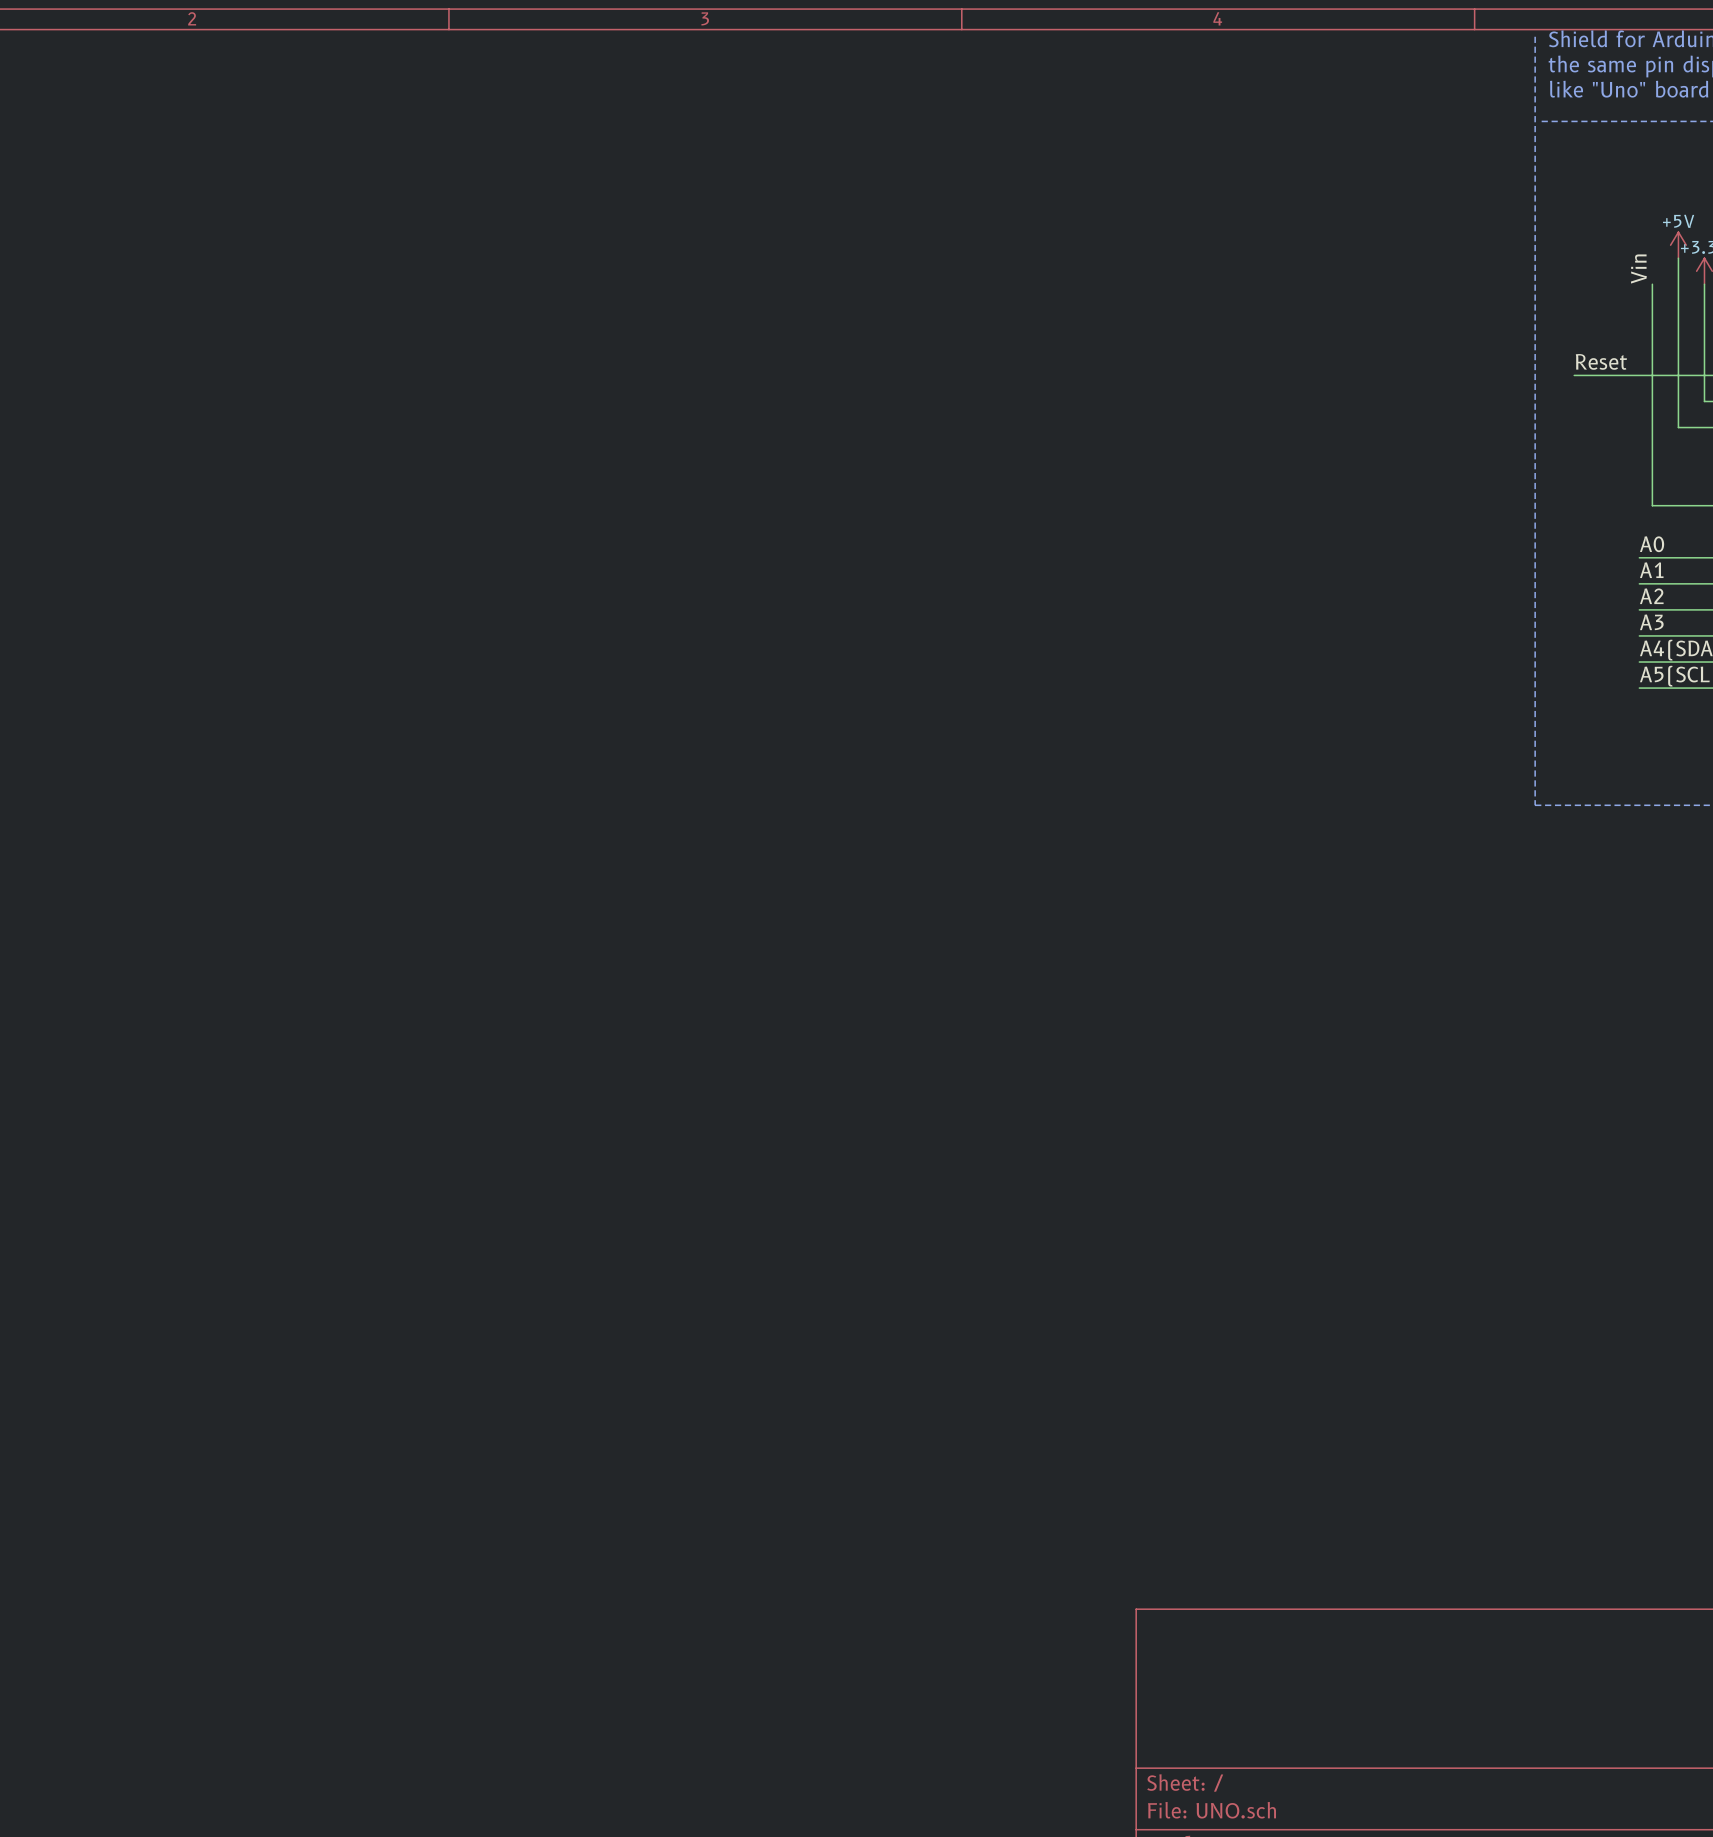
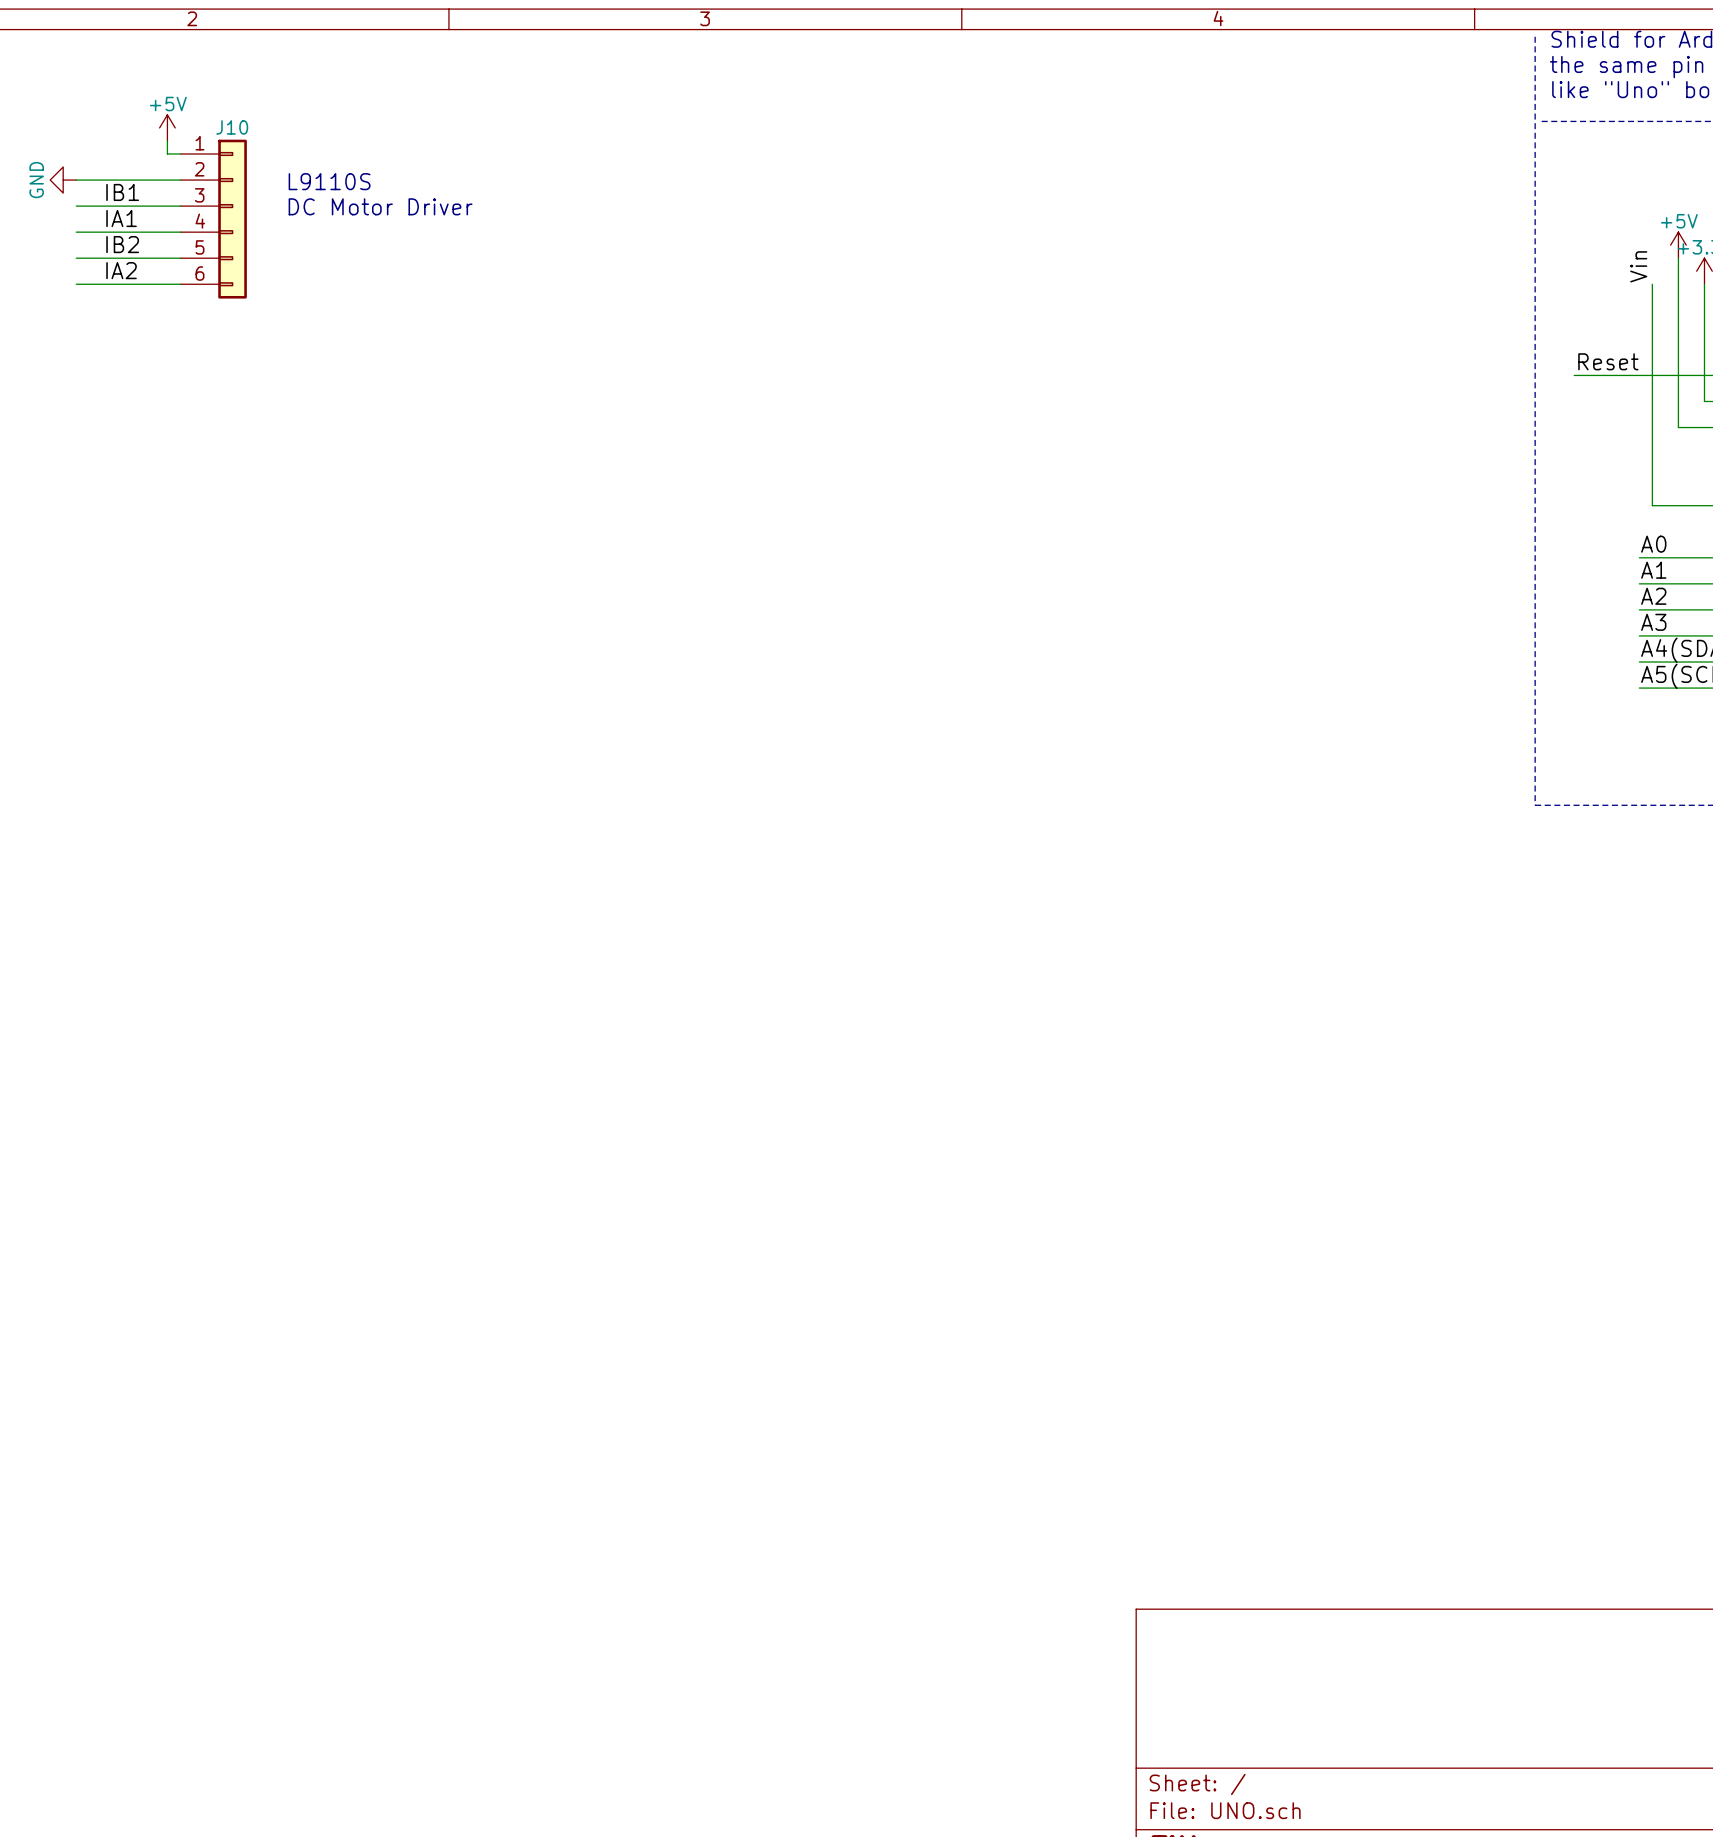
power symbol: none -> +5V (167, 127)
wire: none -> (167, 140) (167, 153) (180, 153)
power symbol: none -> GND (63, 180)
wire: none -> (76, 180) (180, 180)
text: none -> L9110S (329, 181)
label: none -> IB1 (122, 192)
wire: none -> (76, 206) (180, 206)
text: none -> DC Motor Driver (380, 206)
label: none -> IA1 (121, 218)
J10: none -> (213, 219)
wire: none -> (76, 232) (180, 232)
label: none -> IB2 (122, 244)
wire: none -> (76, 258) (180, 258)
label: none -> IA2 (121, 270)
wire: none -> (76, 284) (180, 284)

